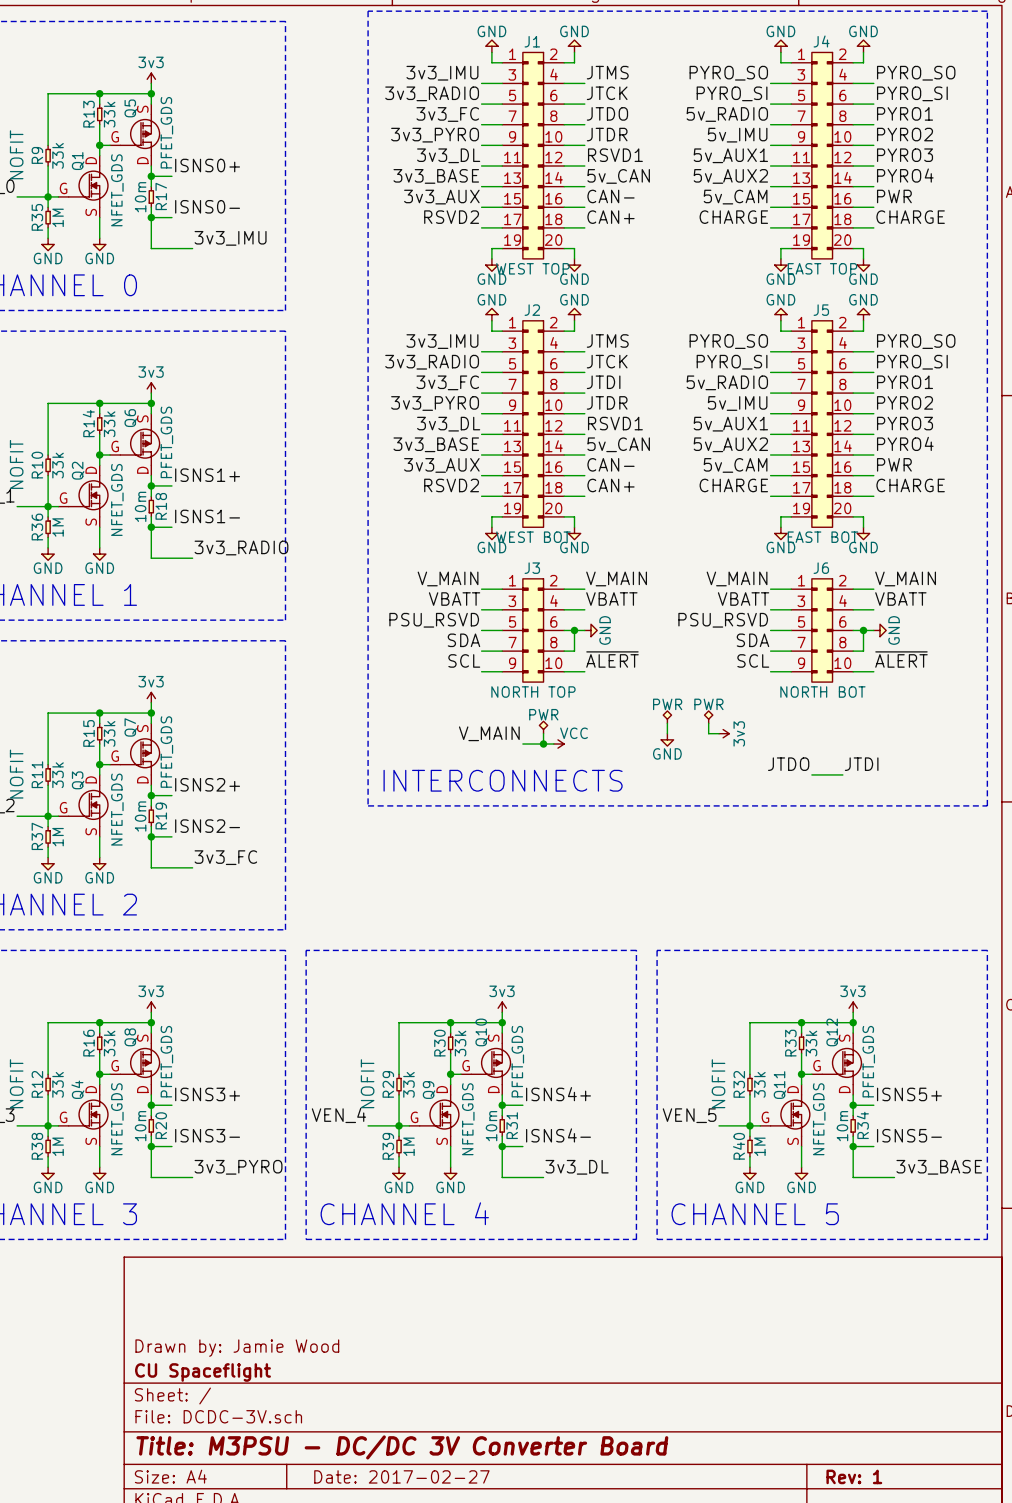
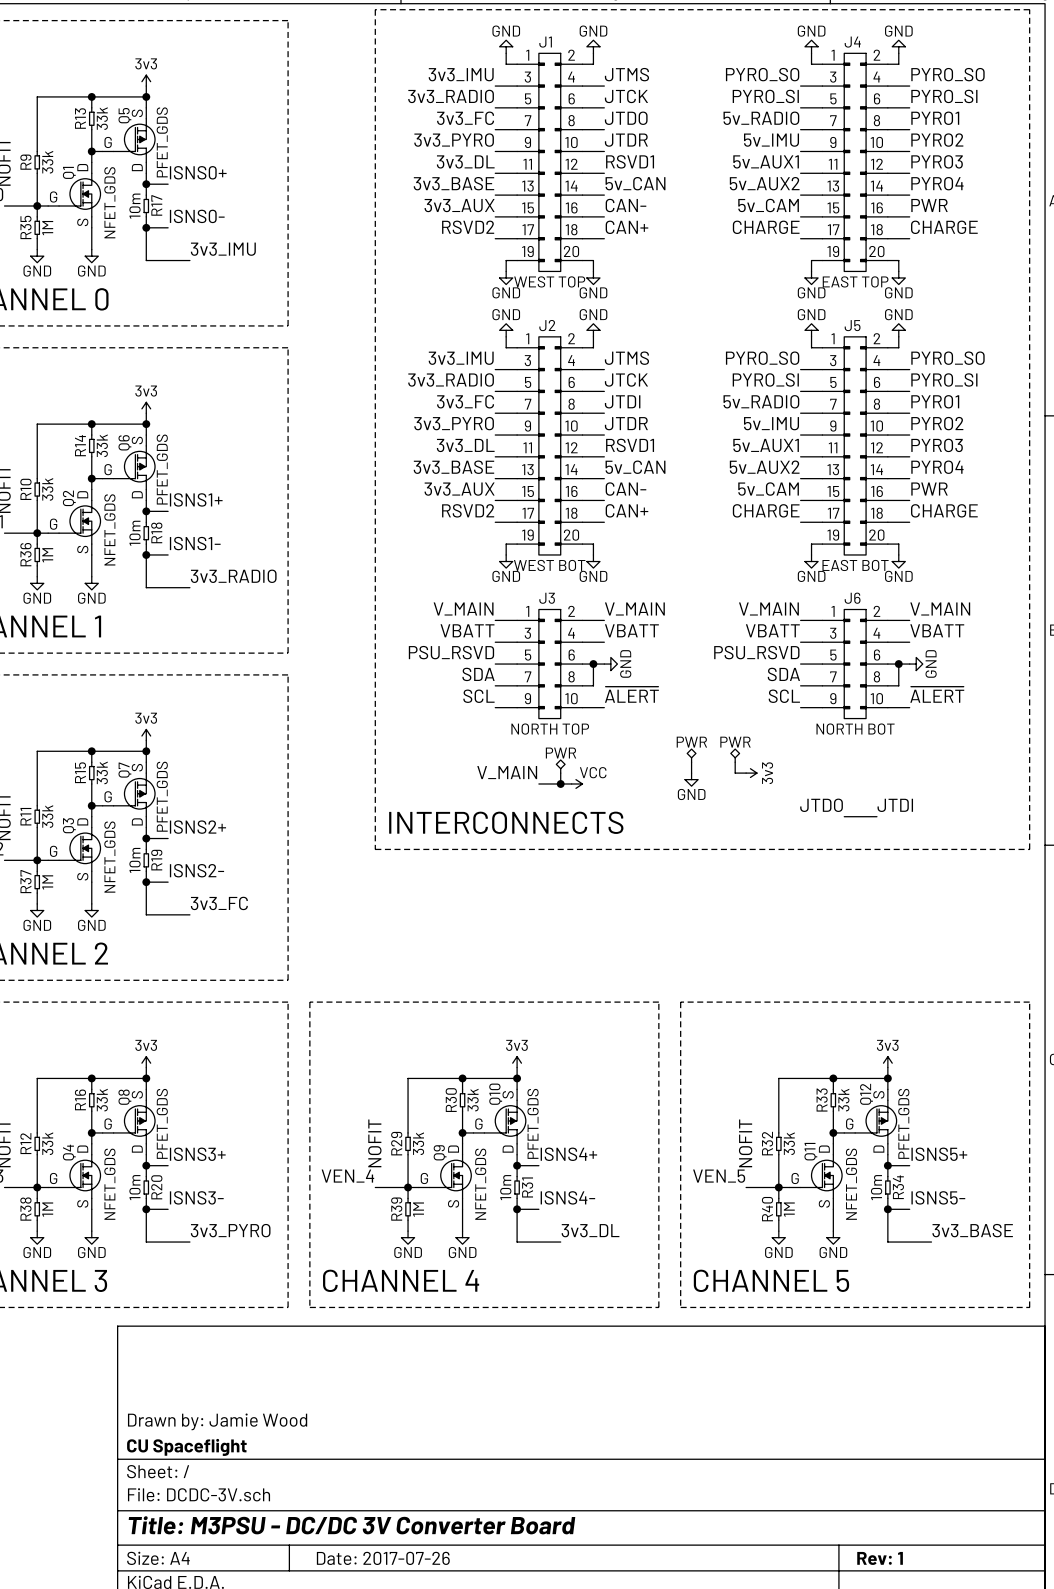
title block: Date: 2017-02-27 (401, 1476) -> Date: 2017-07-26 (383, 1558)

